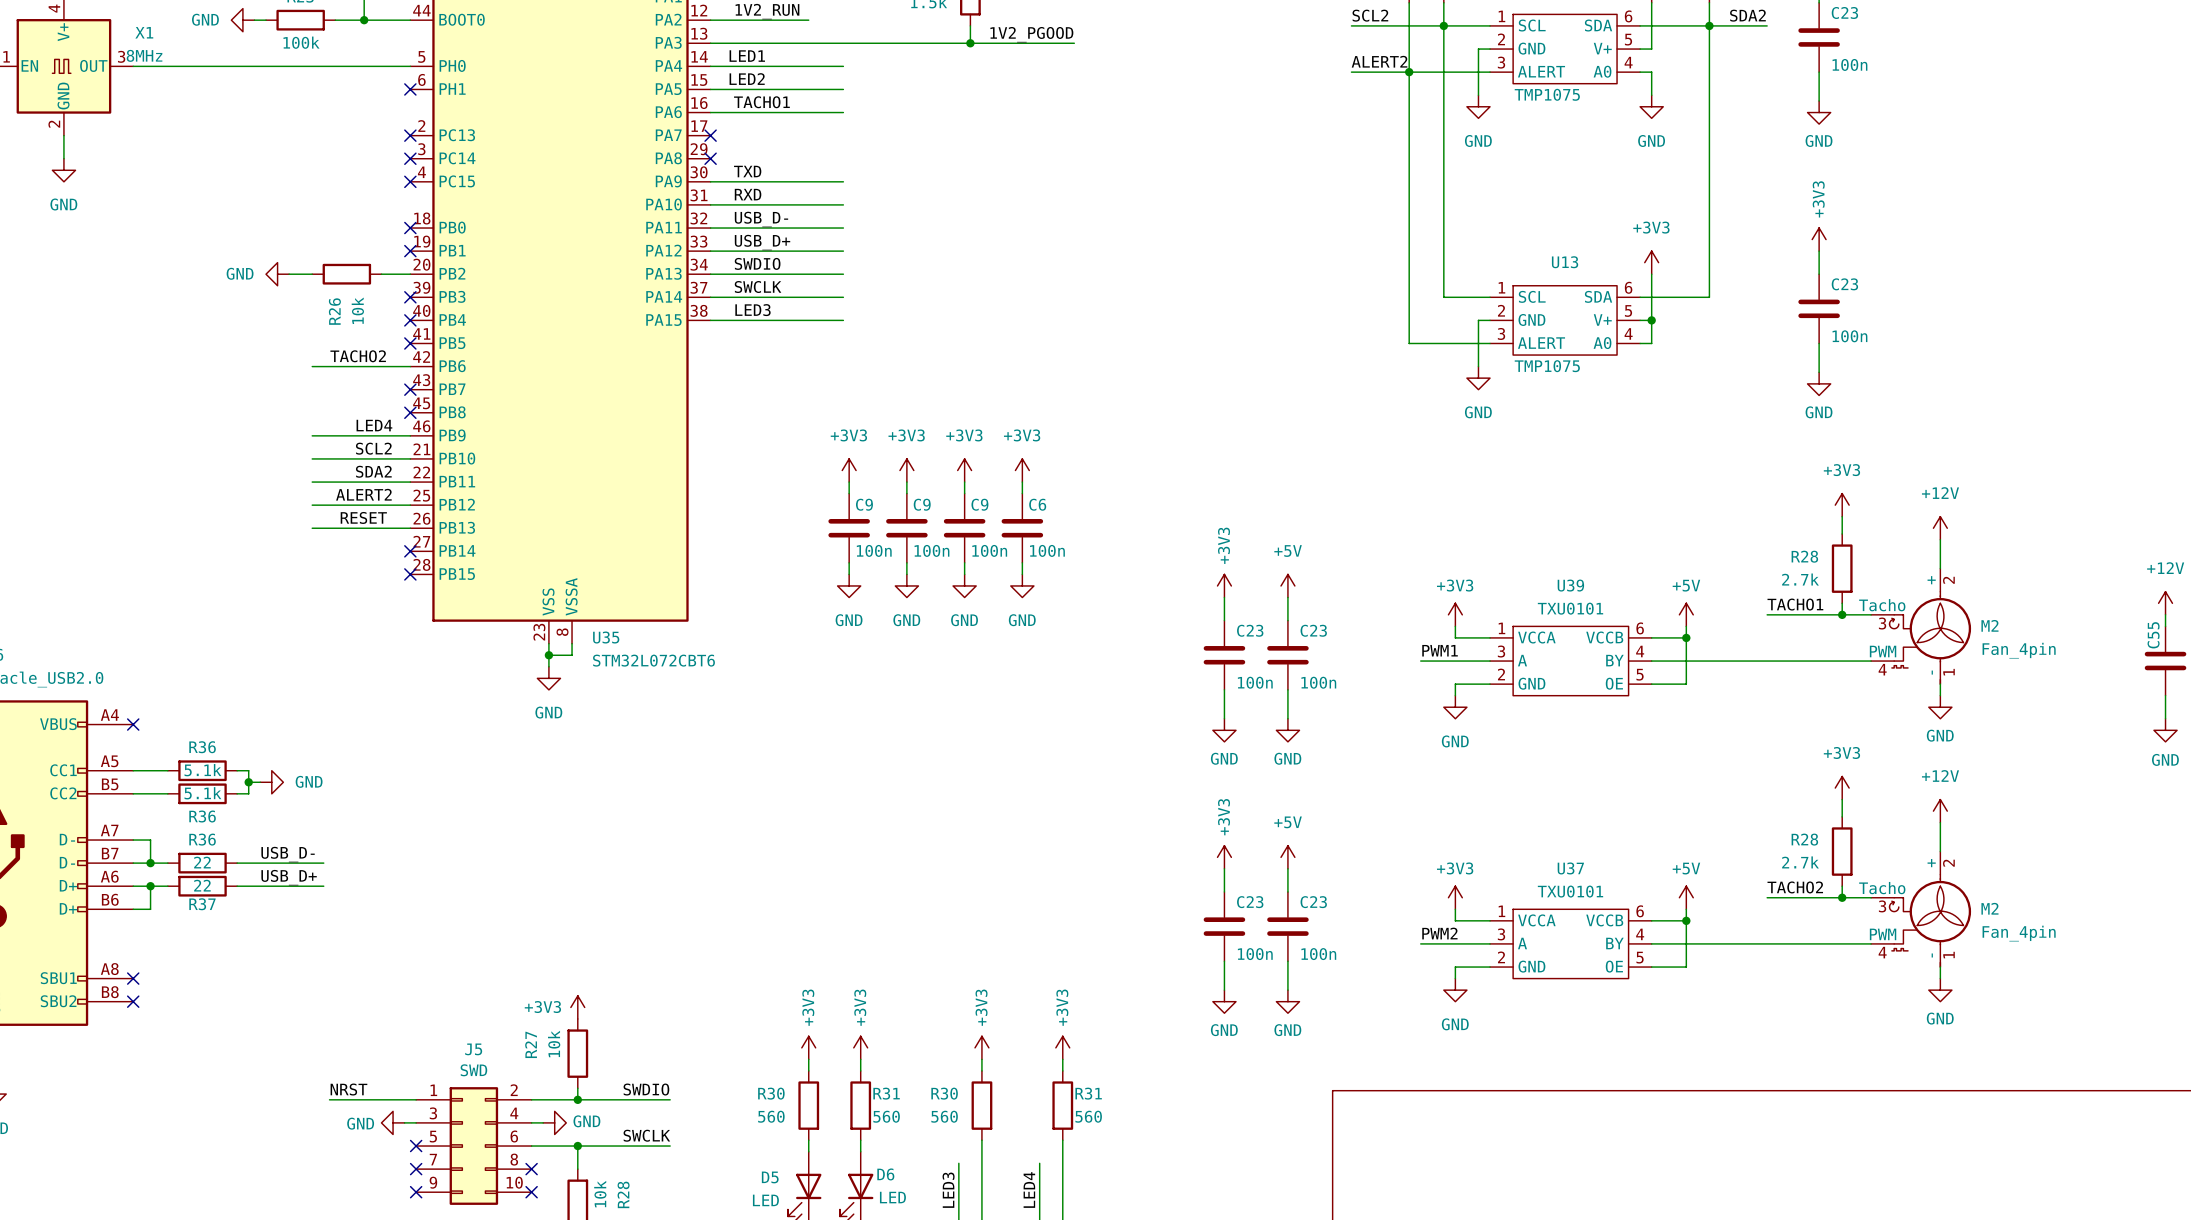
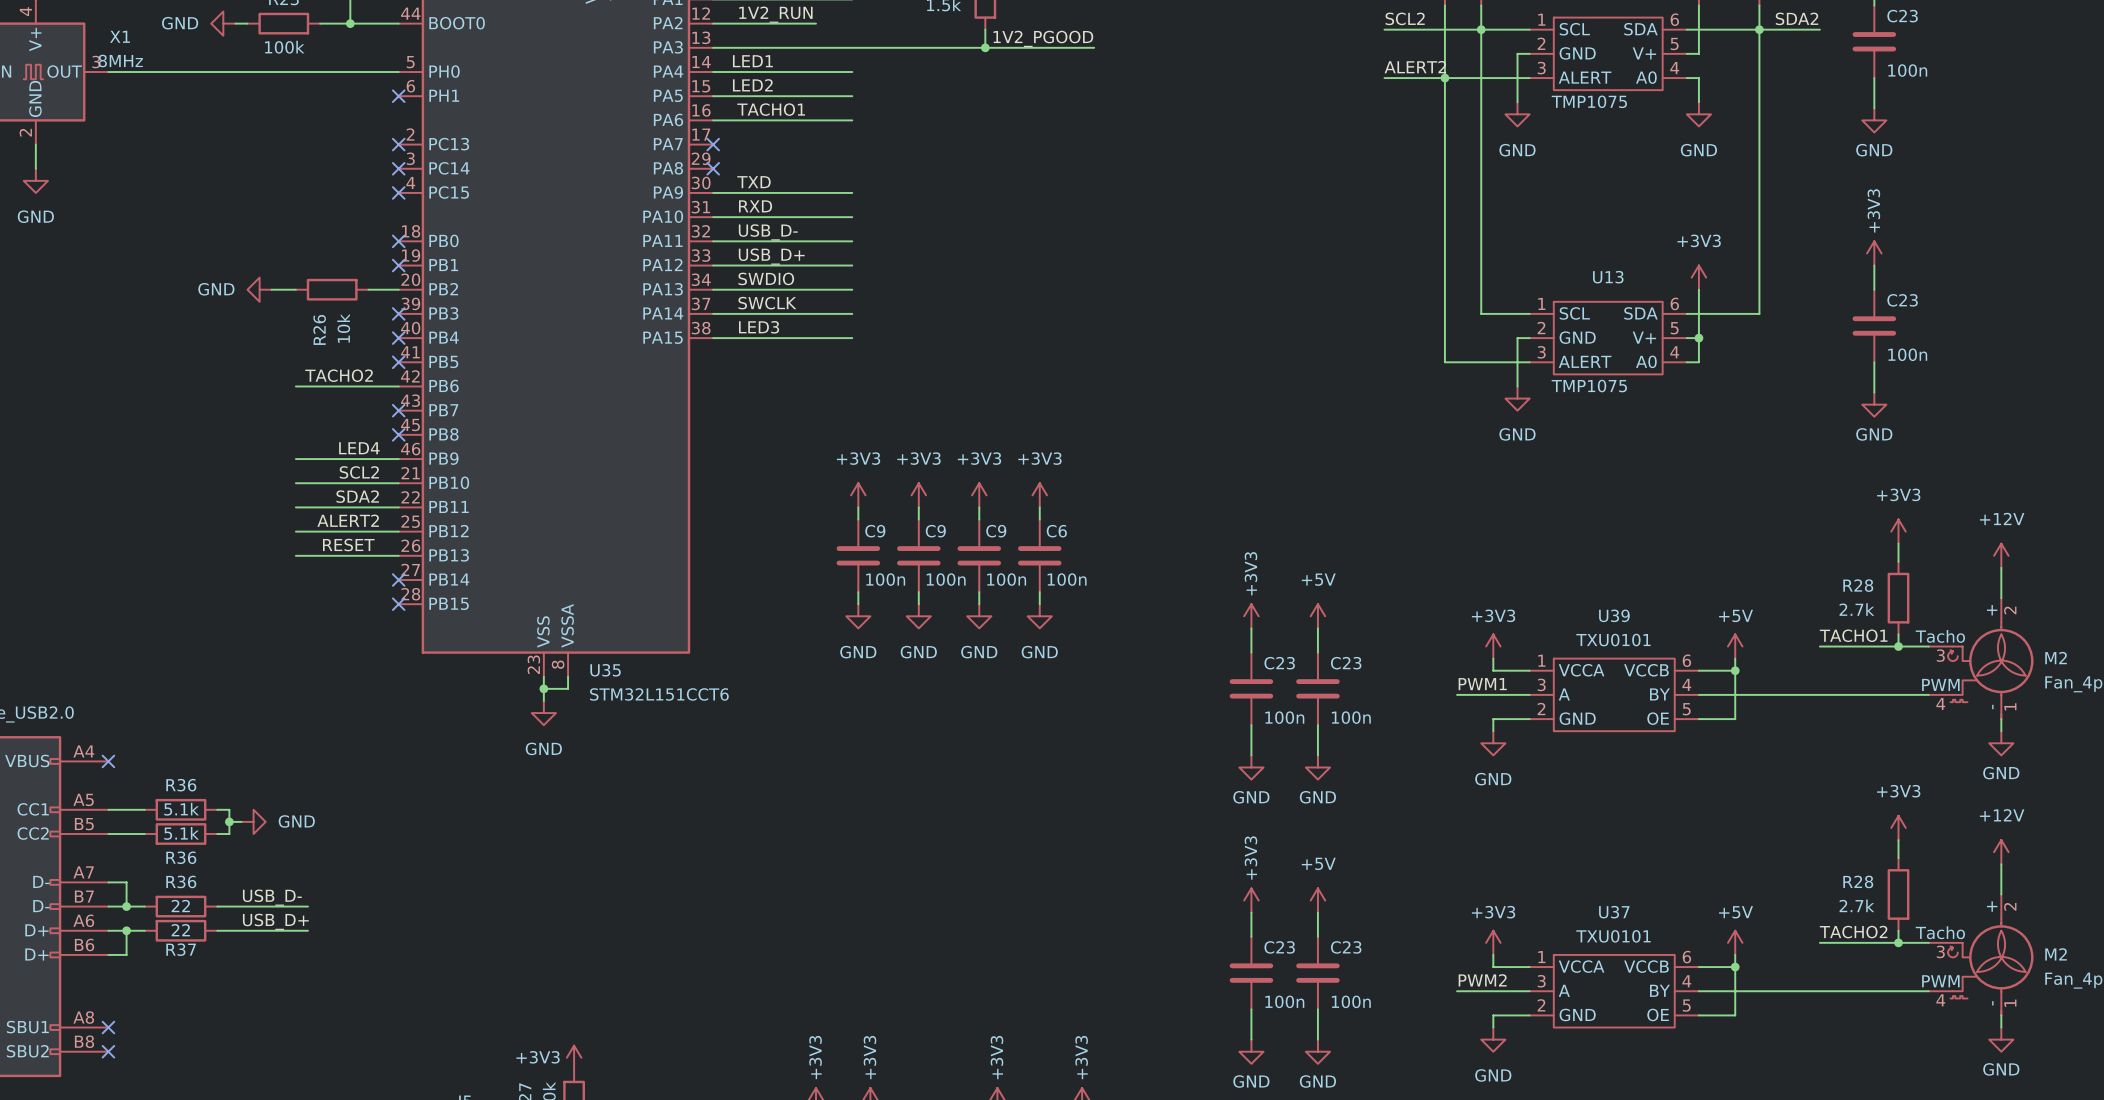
U35 value: STM32L072CBT6 (653, 660) -> STM32L151CCT6 (659, 694)

